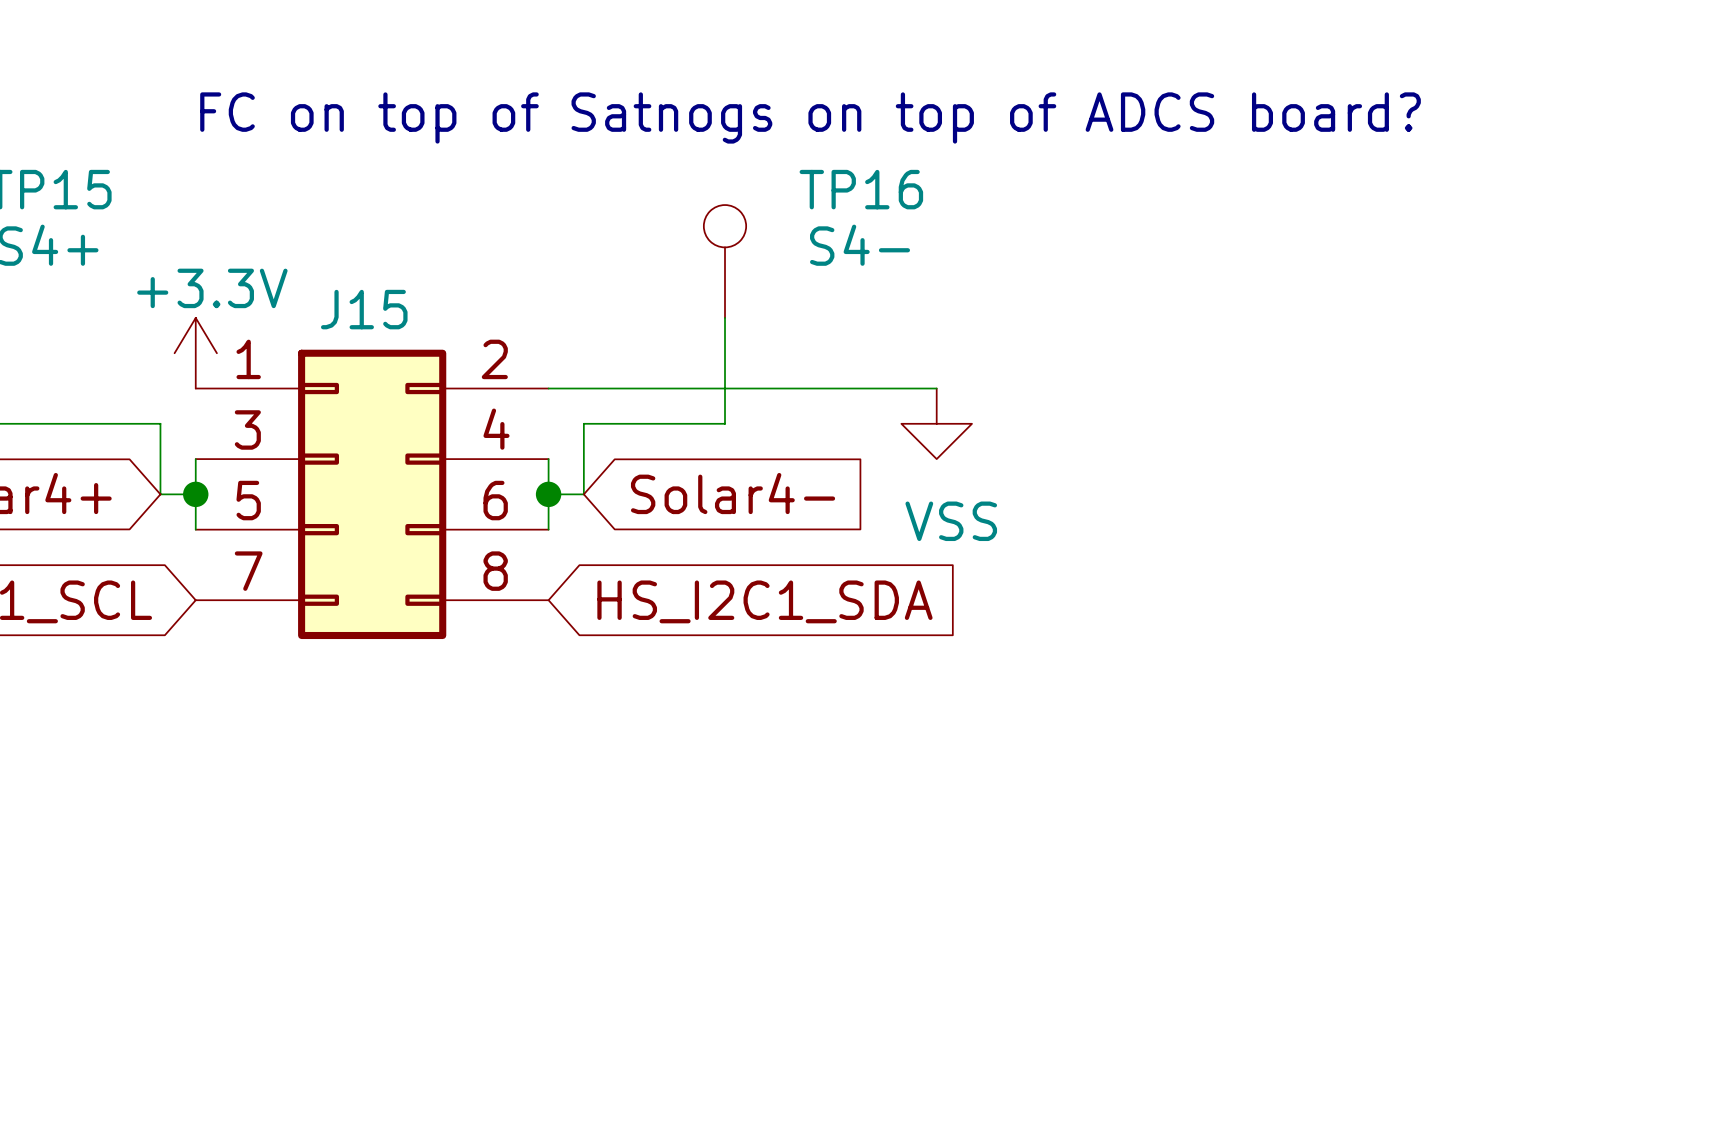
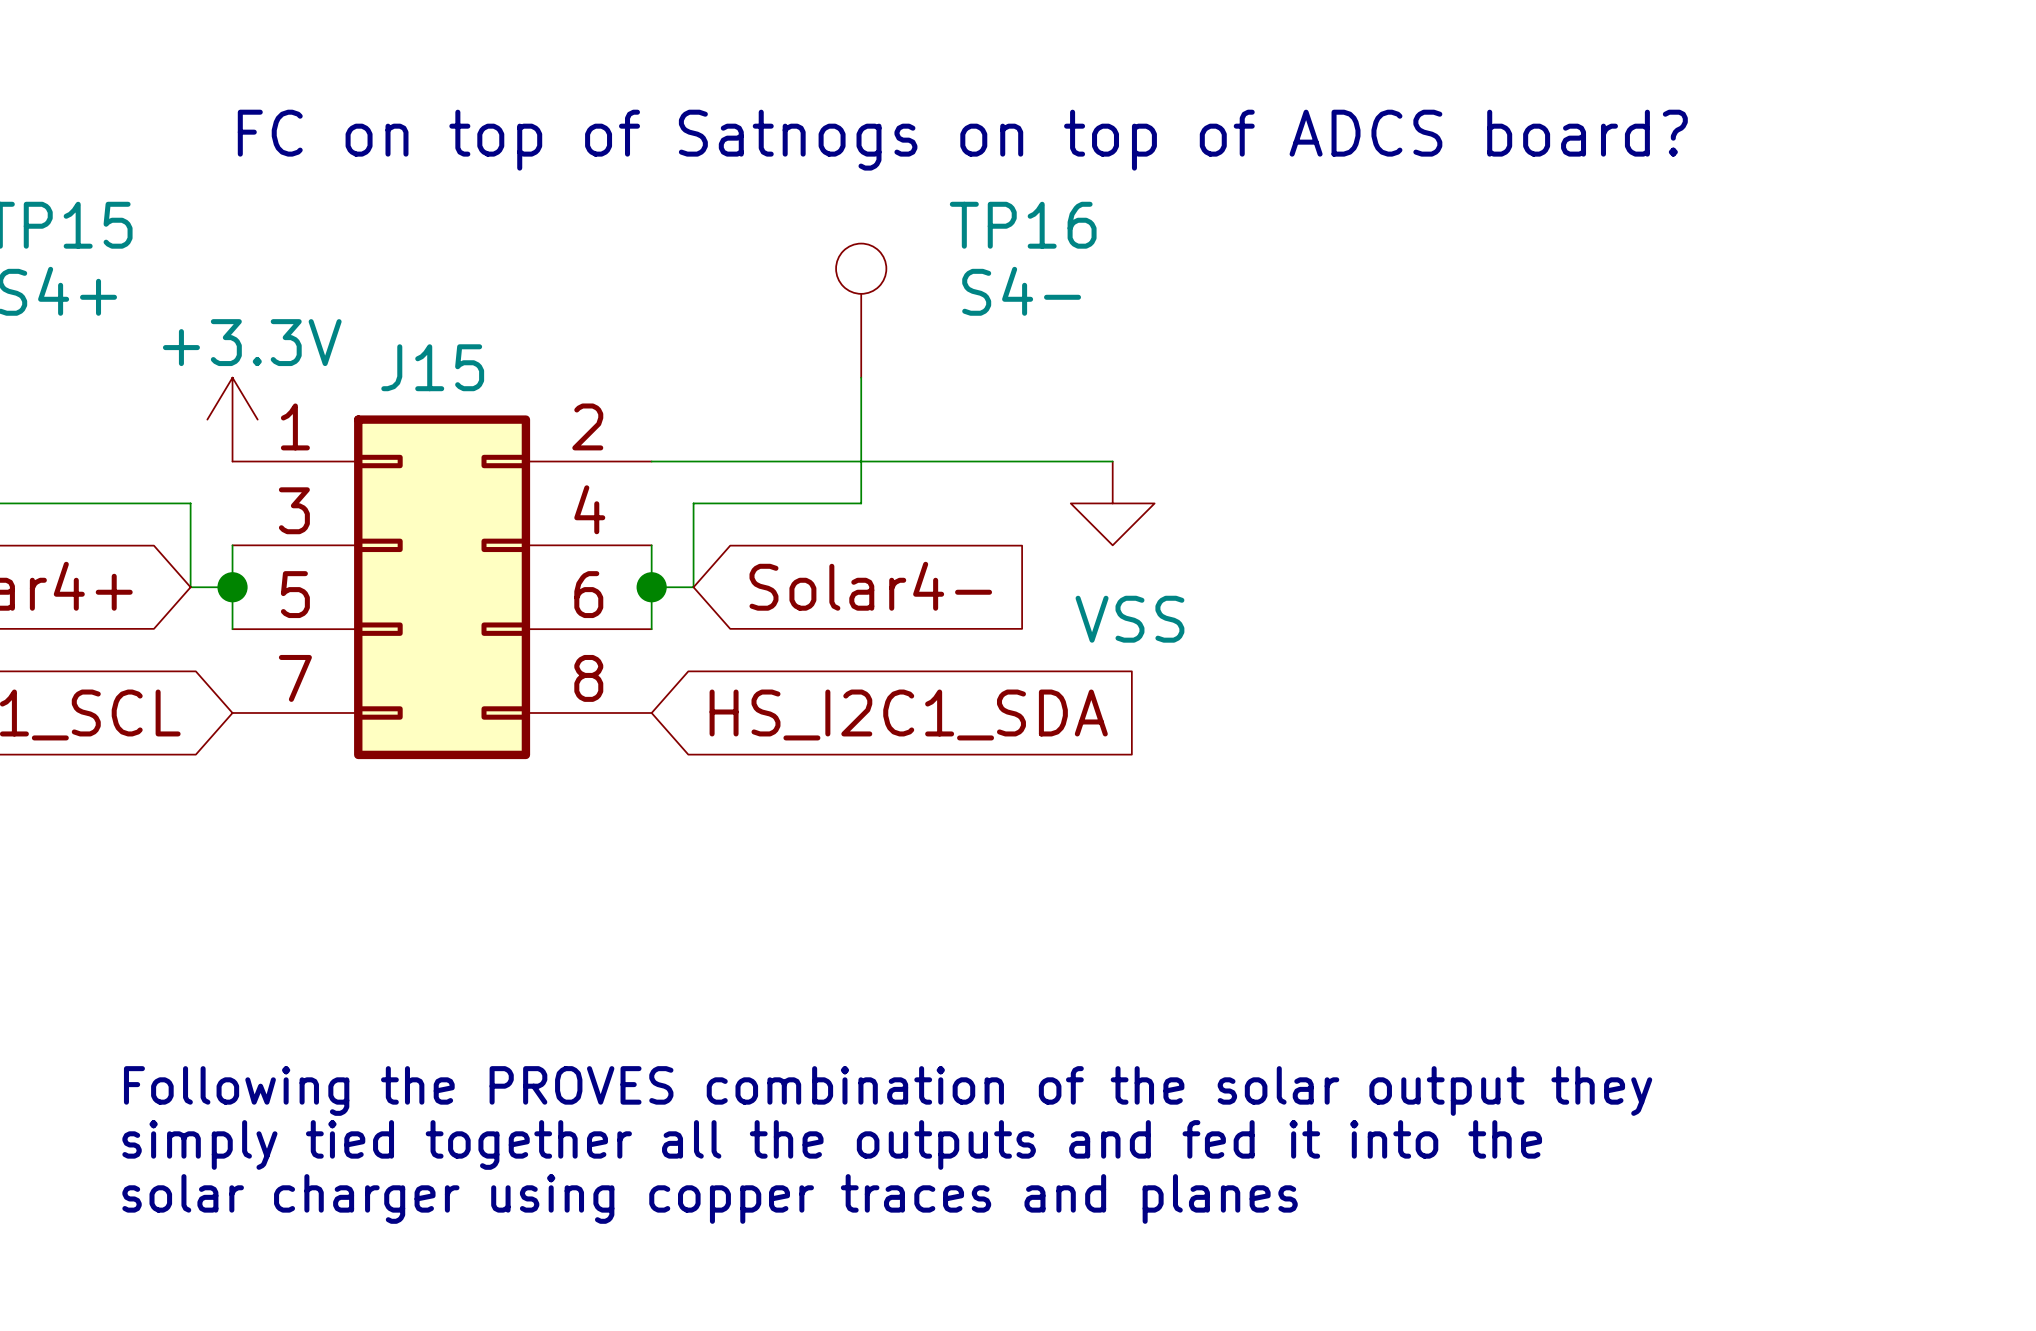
text: none -> Following the PROVES combination of the solar output they (888, 1090)
text: none -> simply tied together all the outputs and fed it into the (832, 1144)
text: none -> solar charger using copper traces and planes (710, 1198)

